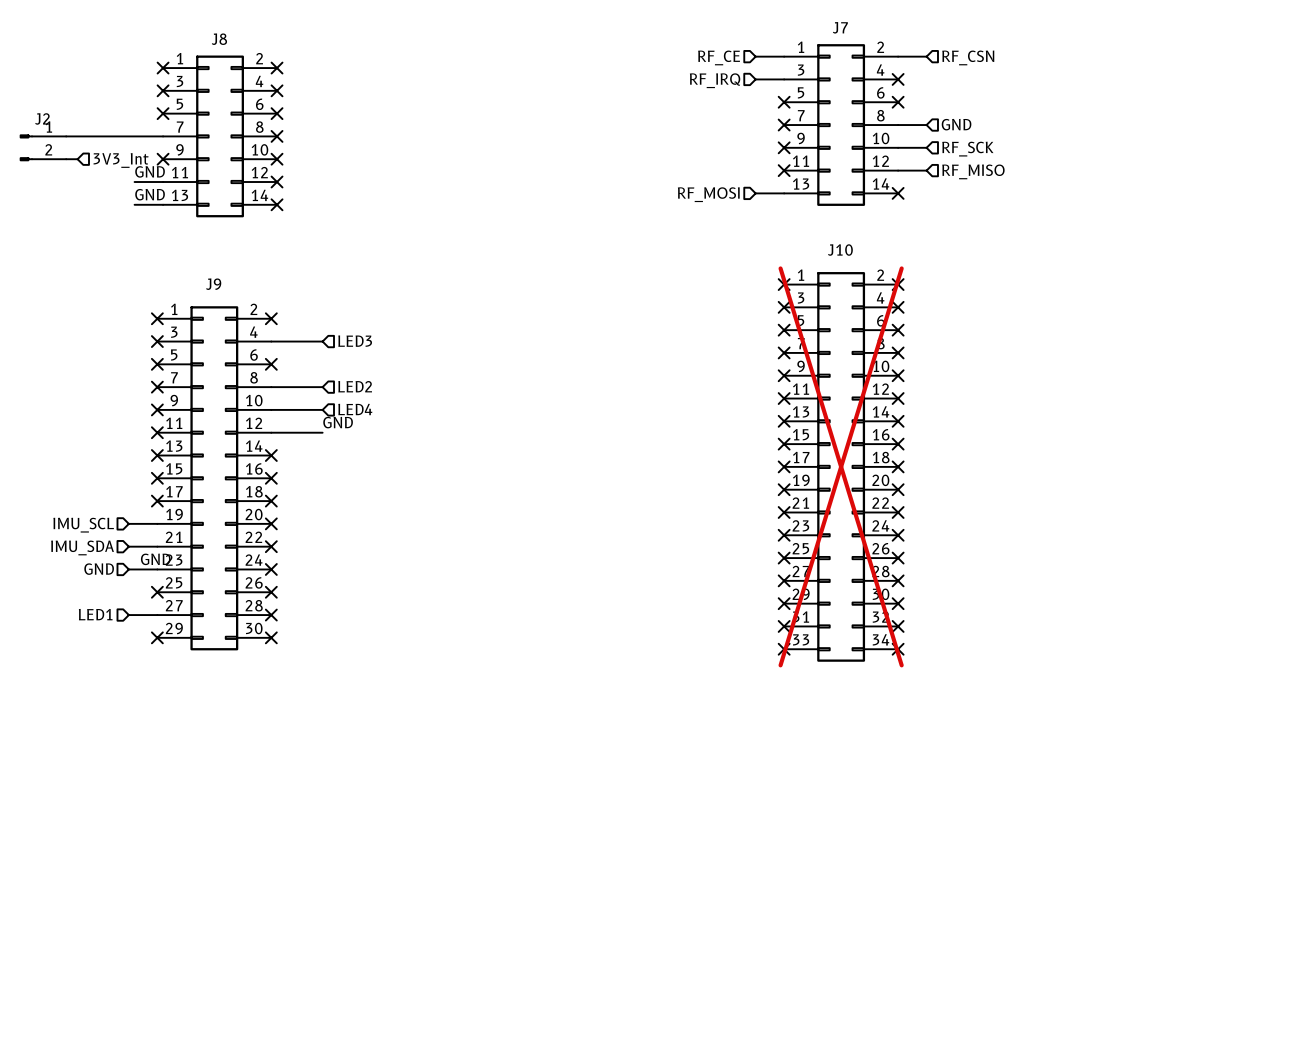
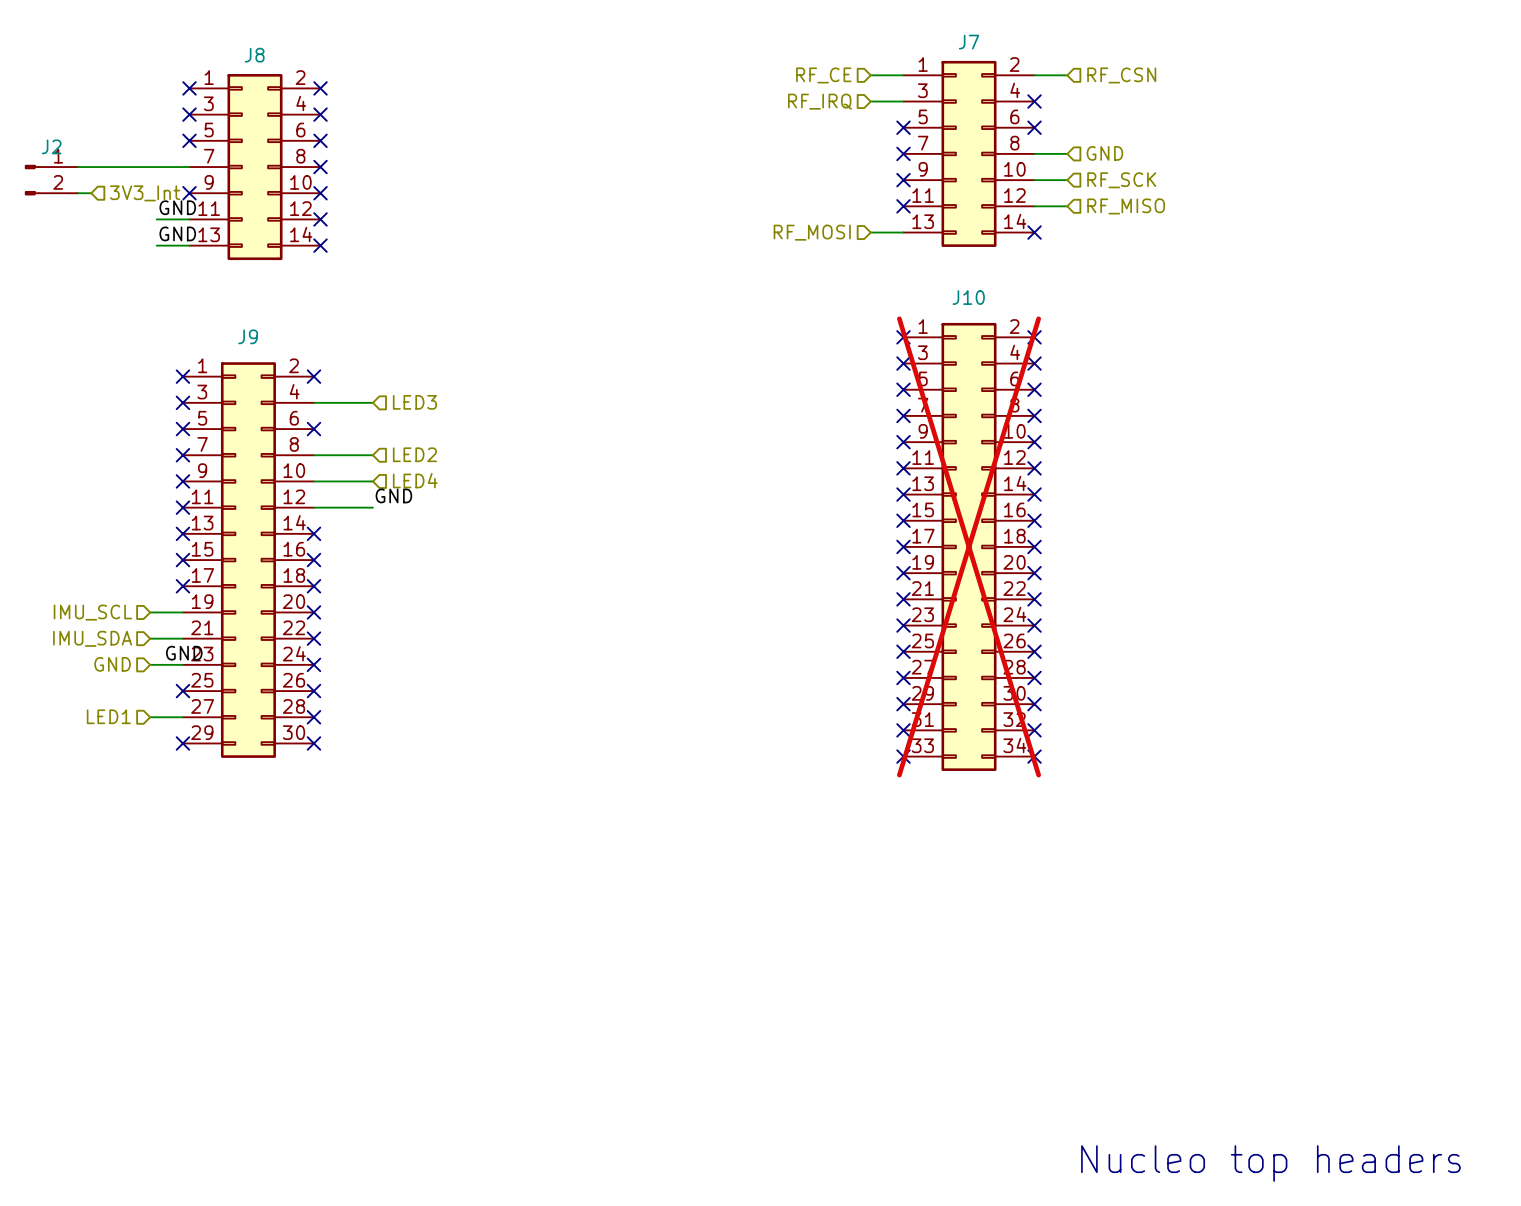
text: none -> Nucleo top headers (1270, 1163)

